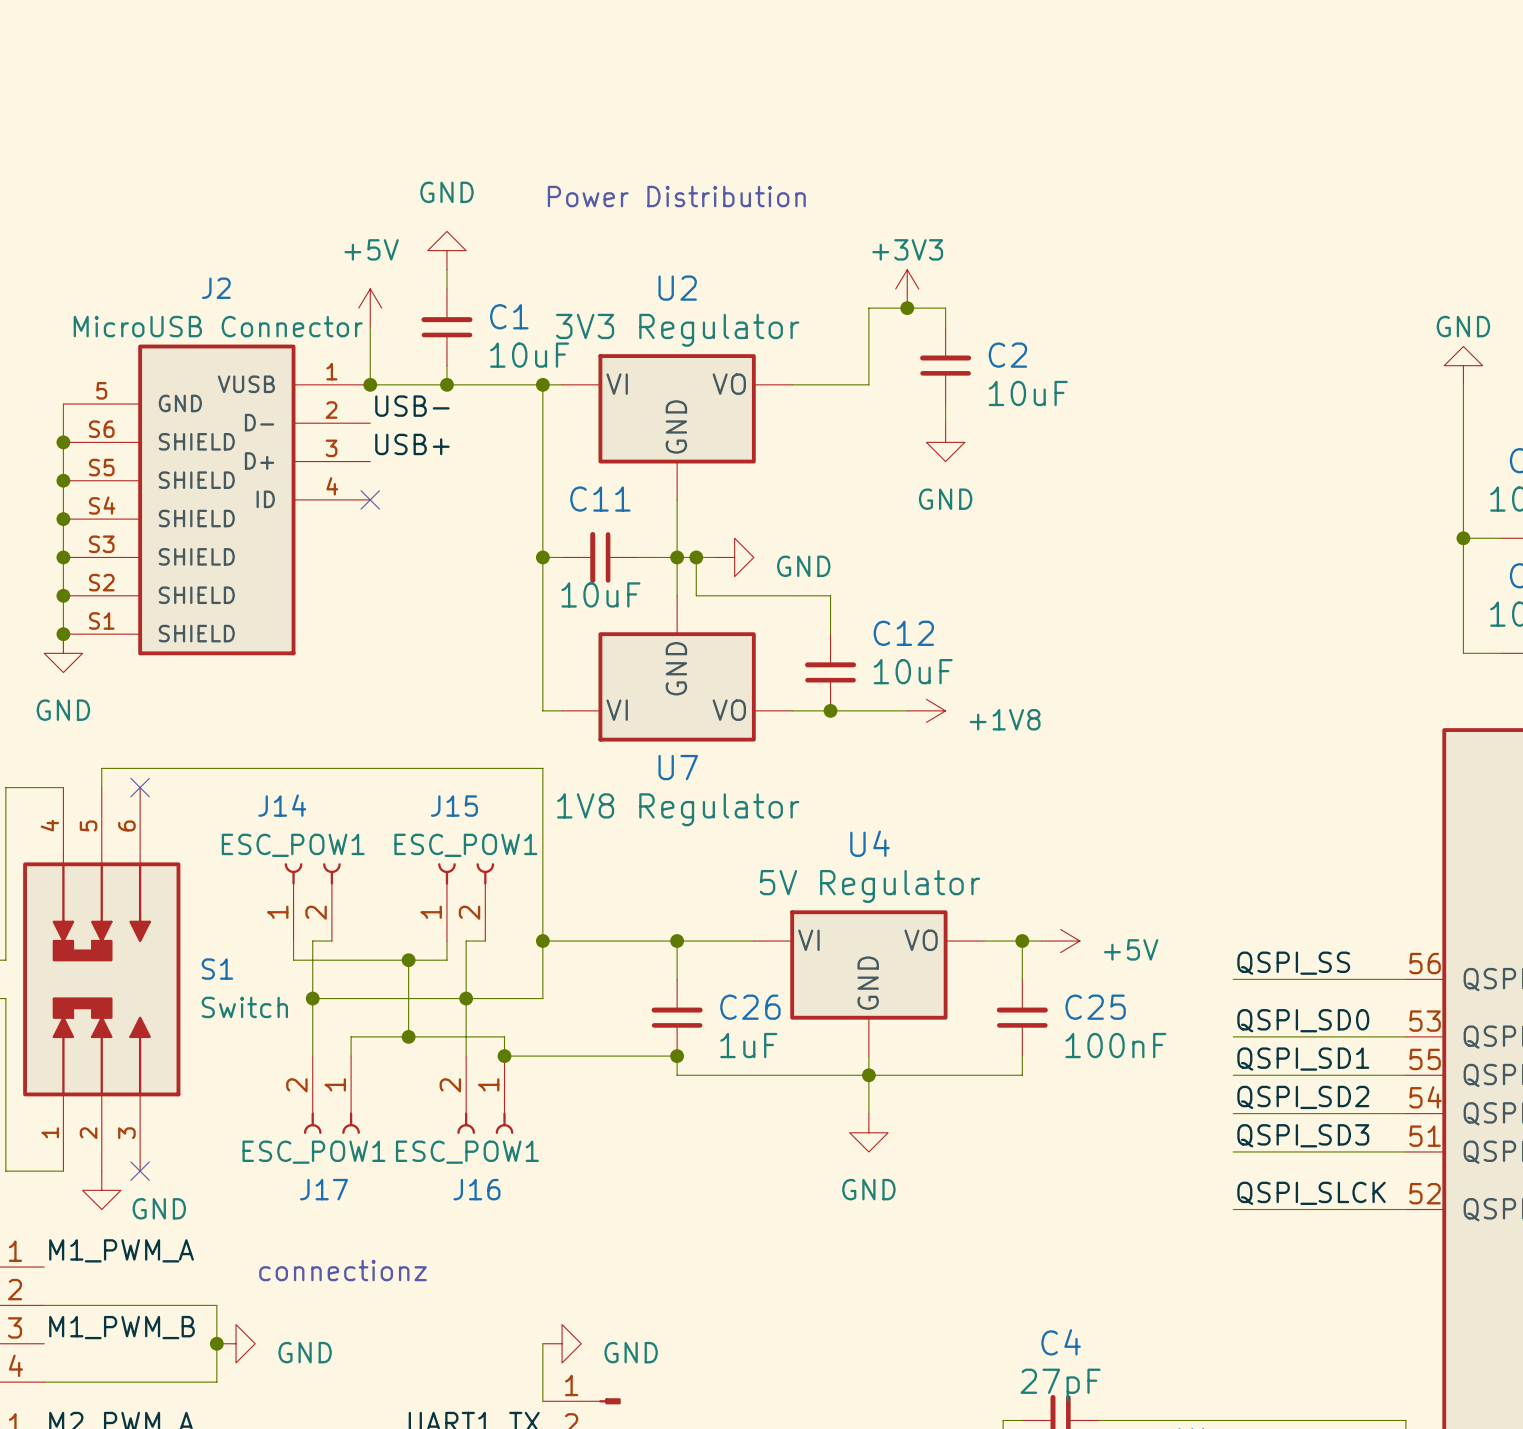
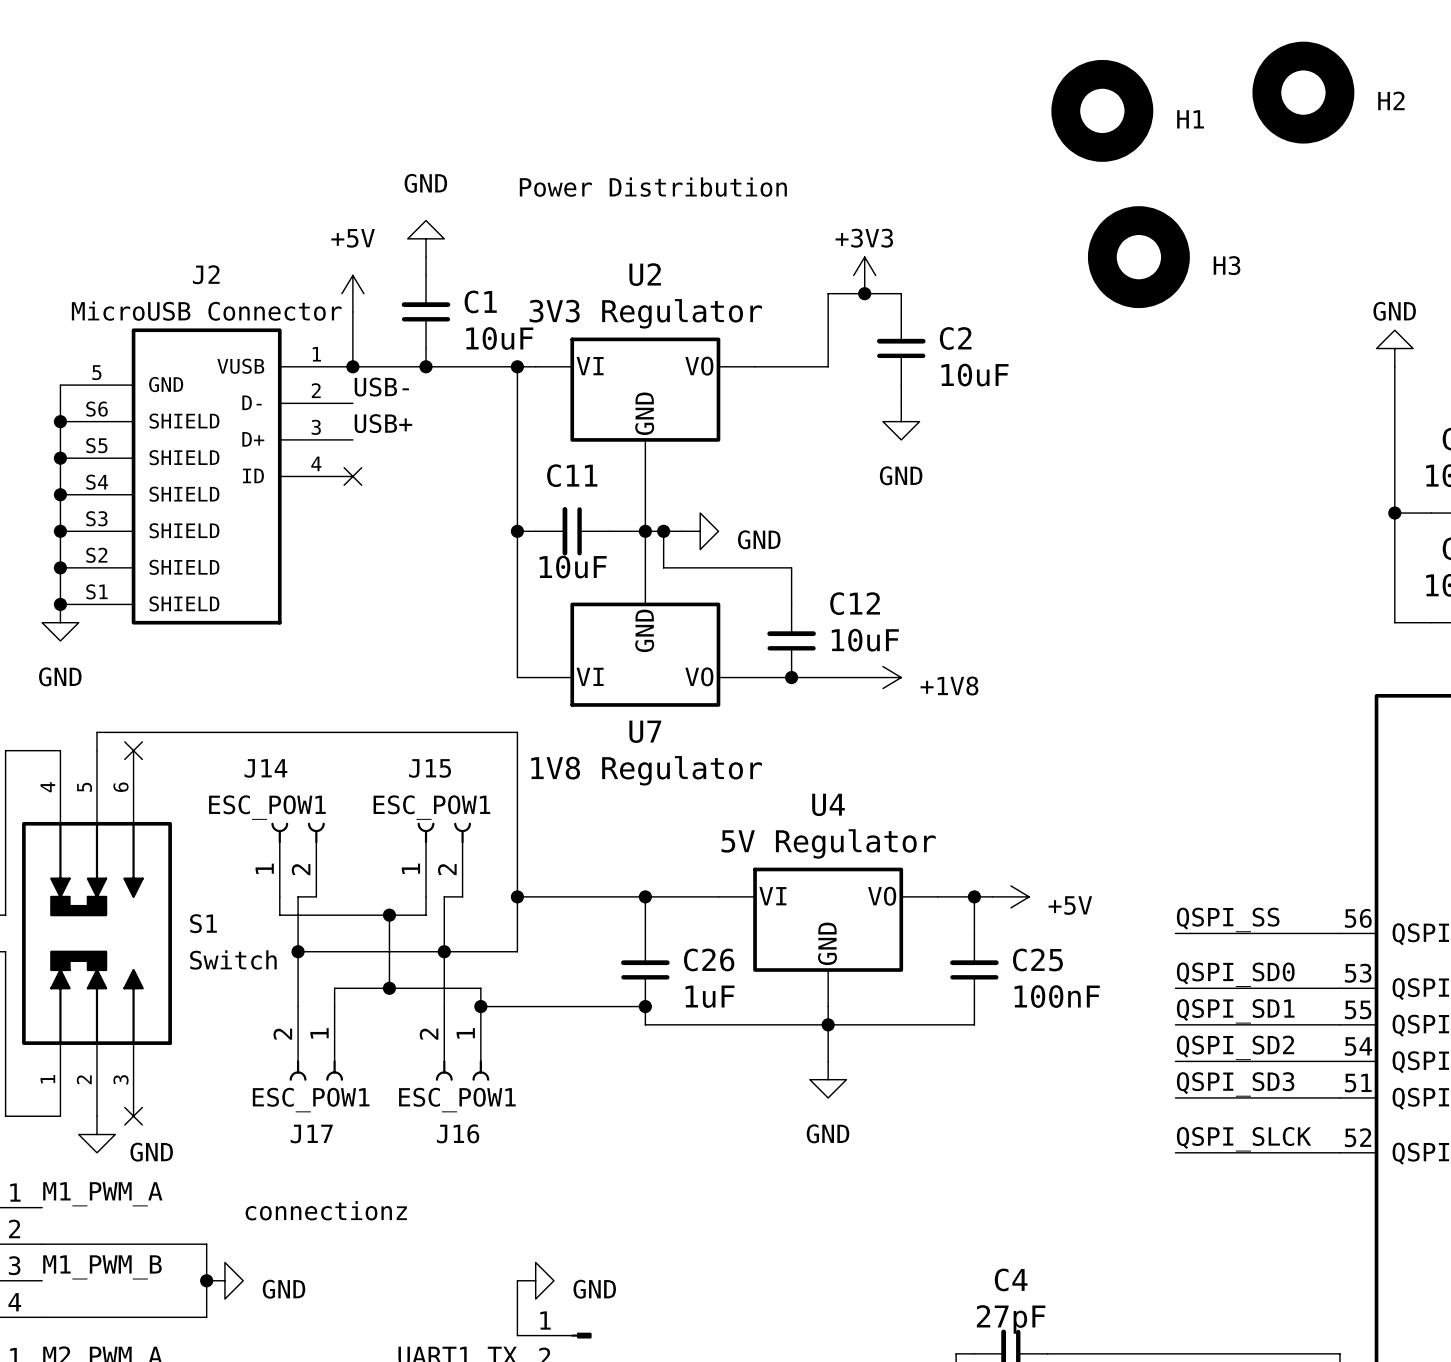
H2: none -> (1303, 92)
H1: none -> (1102, 110)
H3: none -> (1138, 257)

